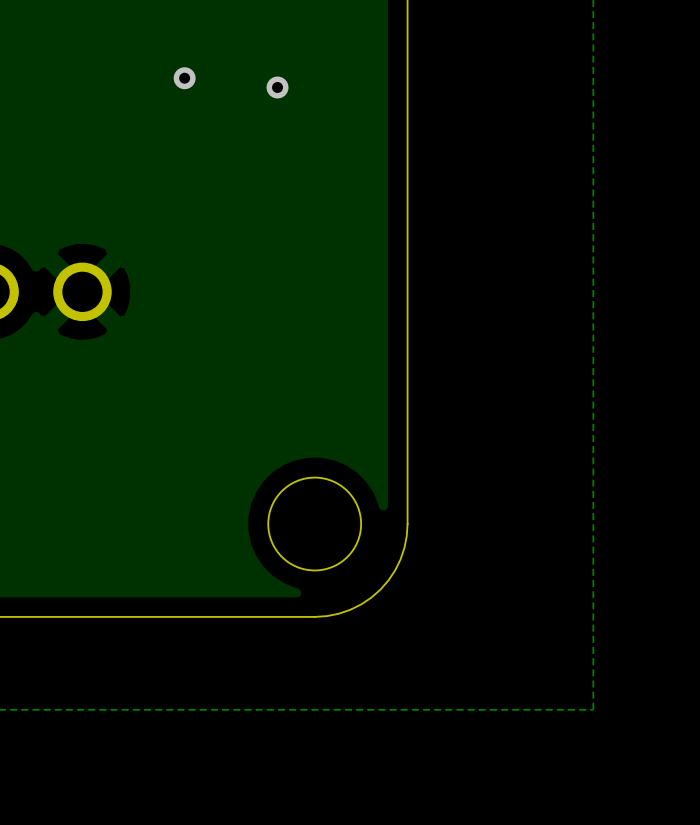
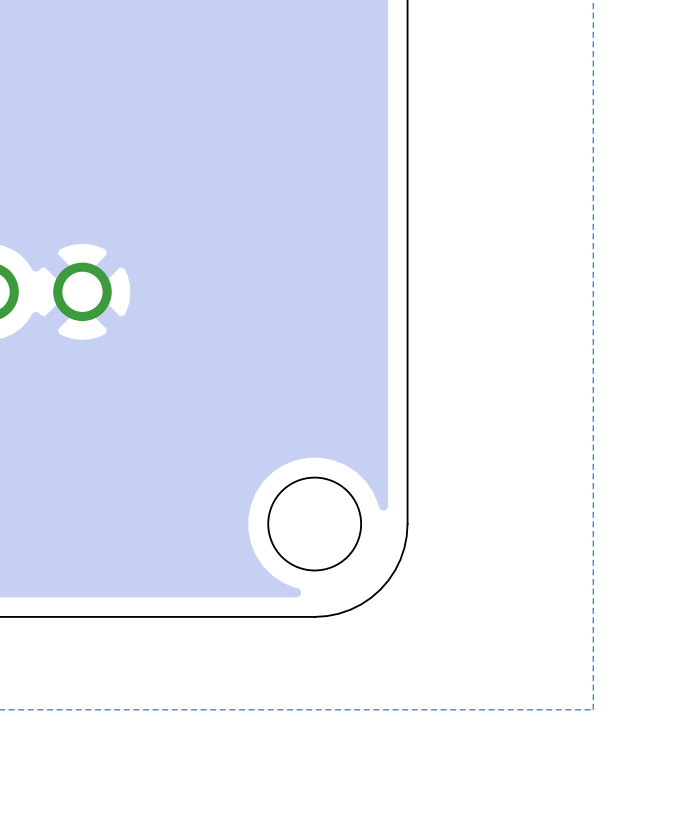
via: (184, 78) -> none
via: (277, 87) -> none

